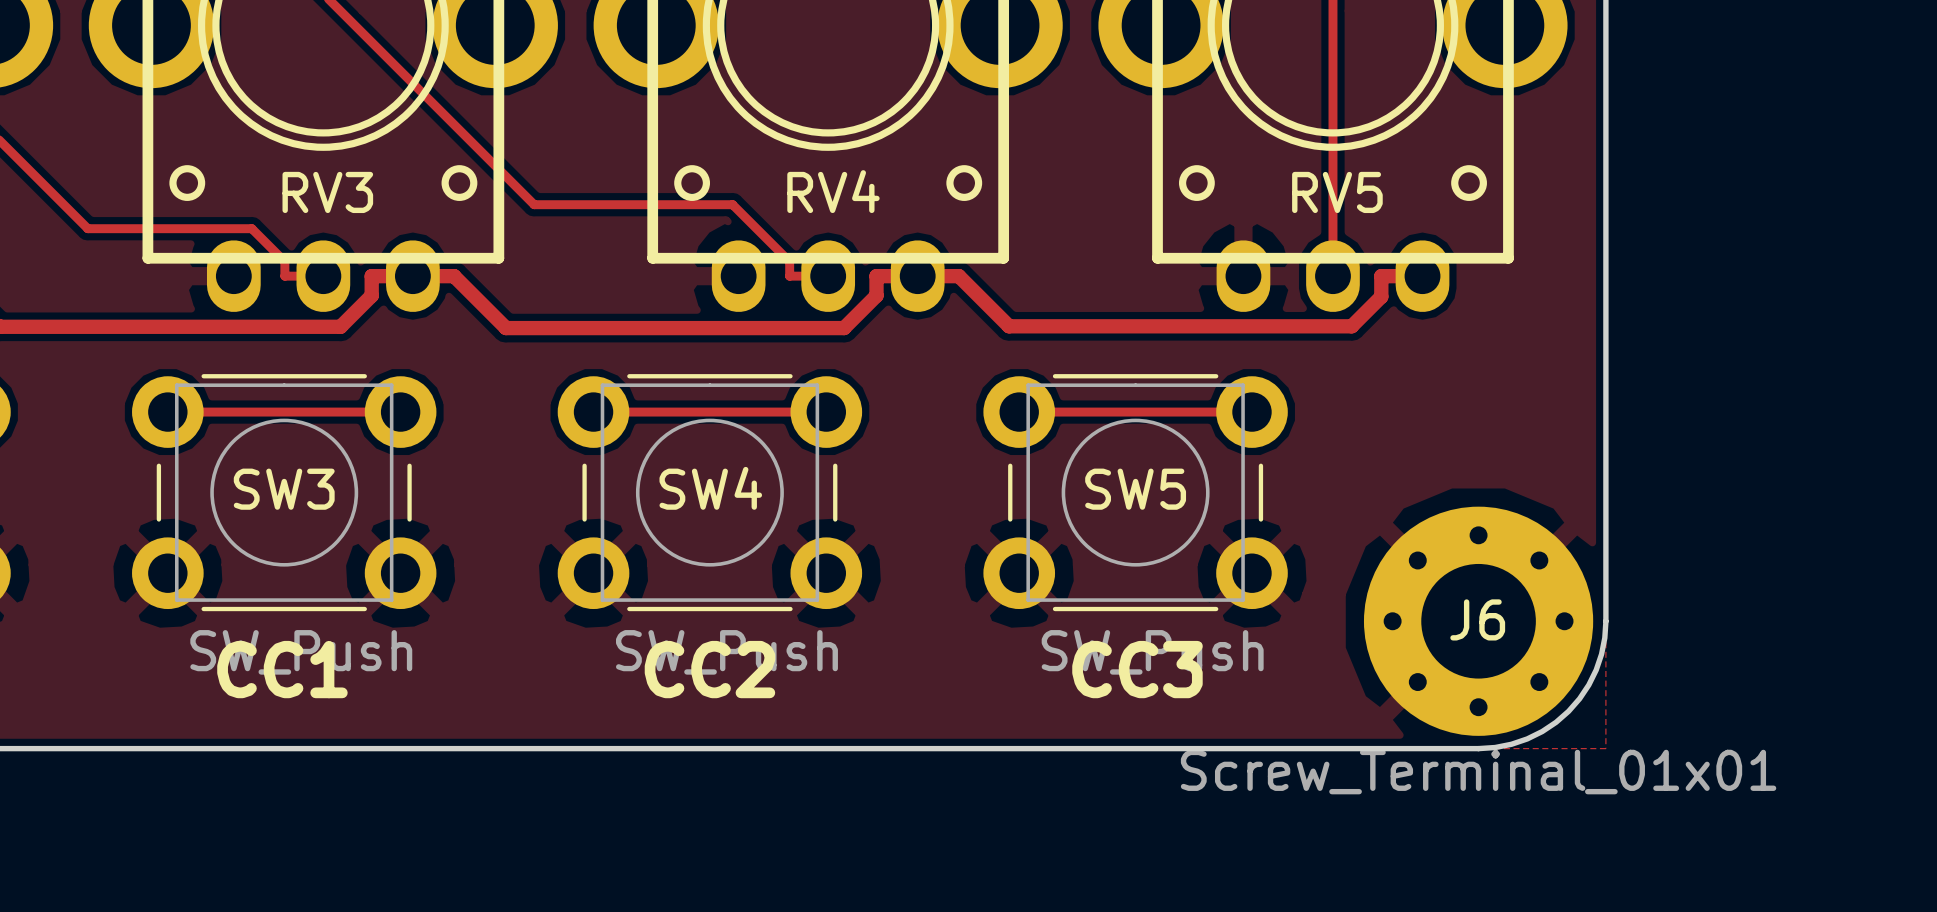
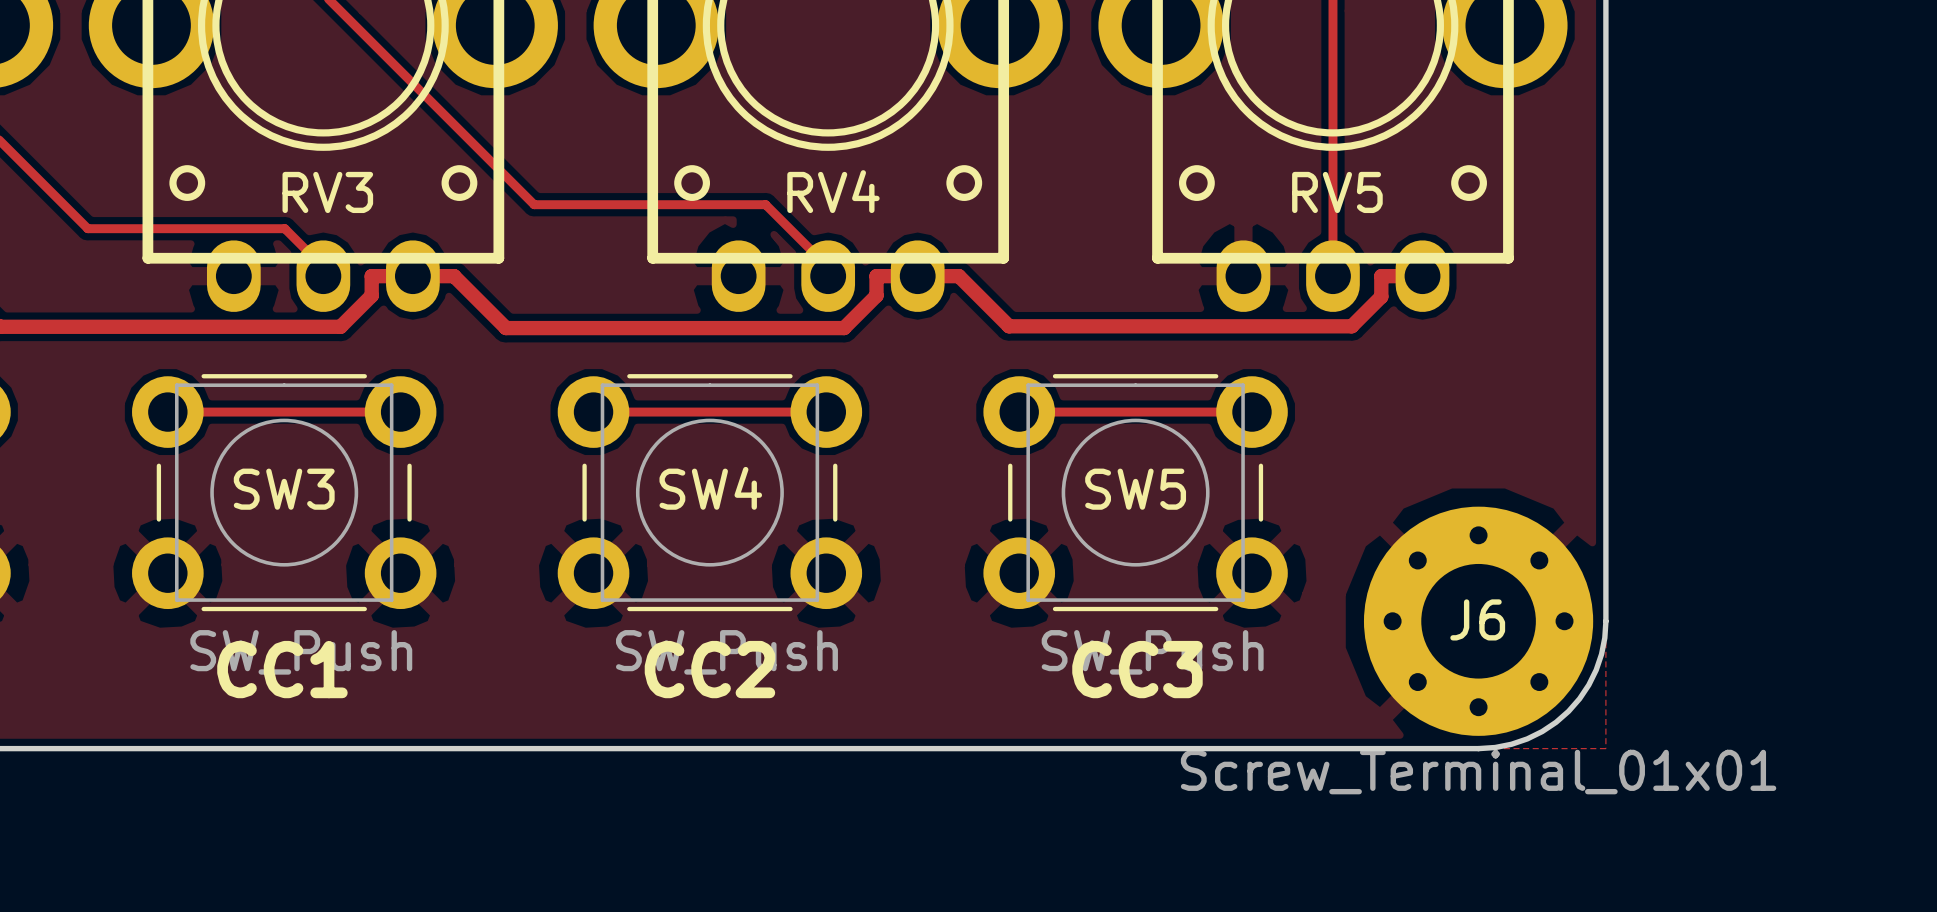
track: (732, 204) (789, 261) (789, 276) (828, 276) -> (732, 204) (765, 204) (828, 267) (828, 276)
track: (251, 228) (284, 261) (284, 276) (323, 276) -> (251, 228) (284, 228) (323, 267) (323, 276)

